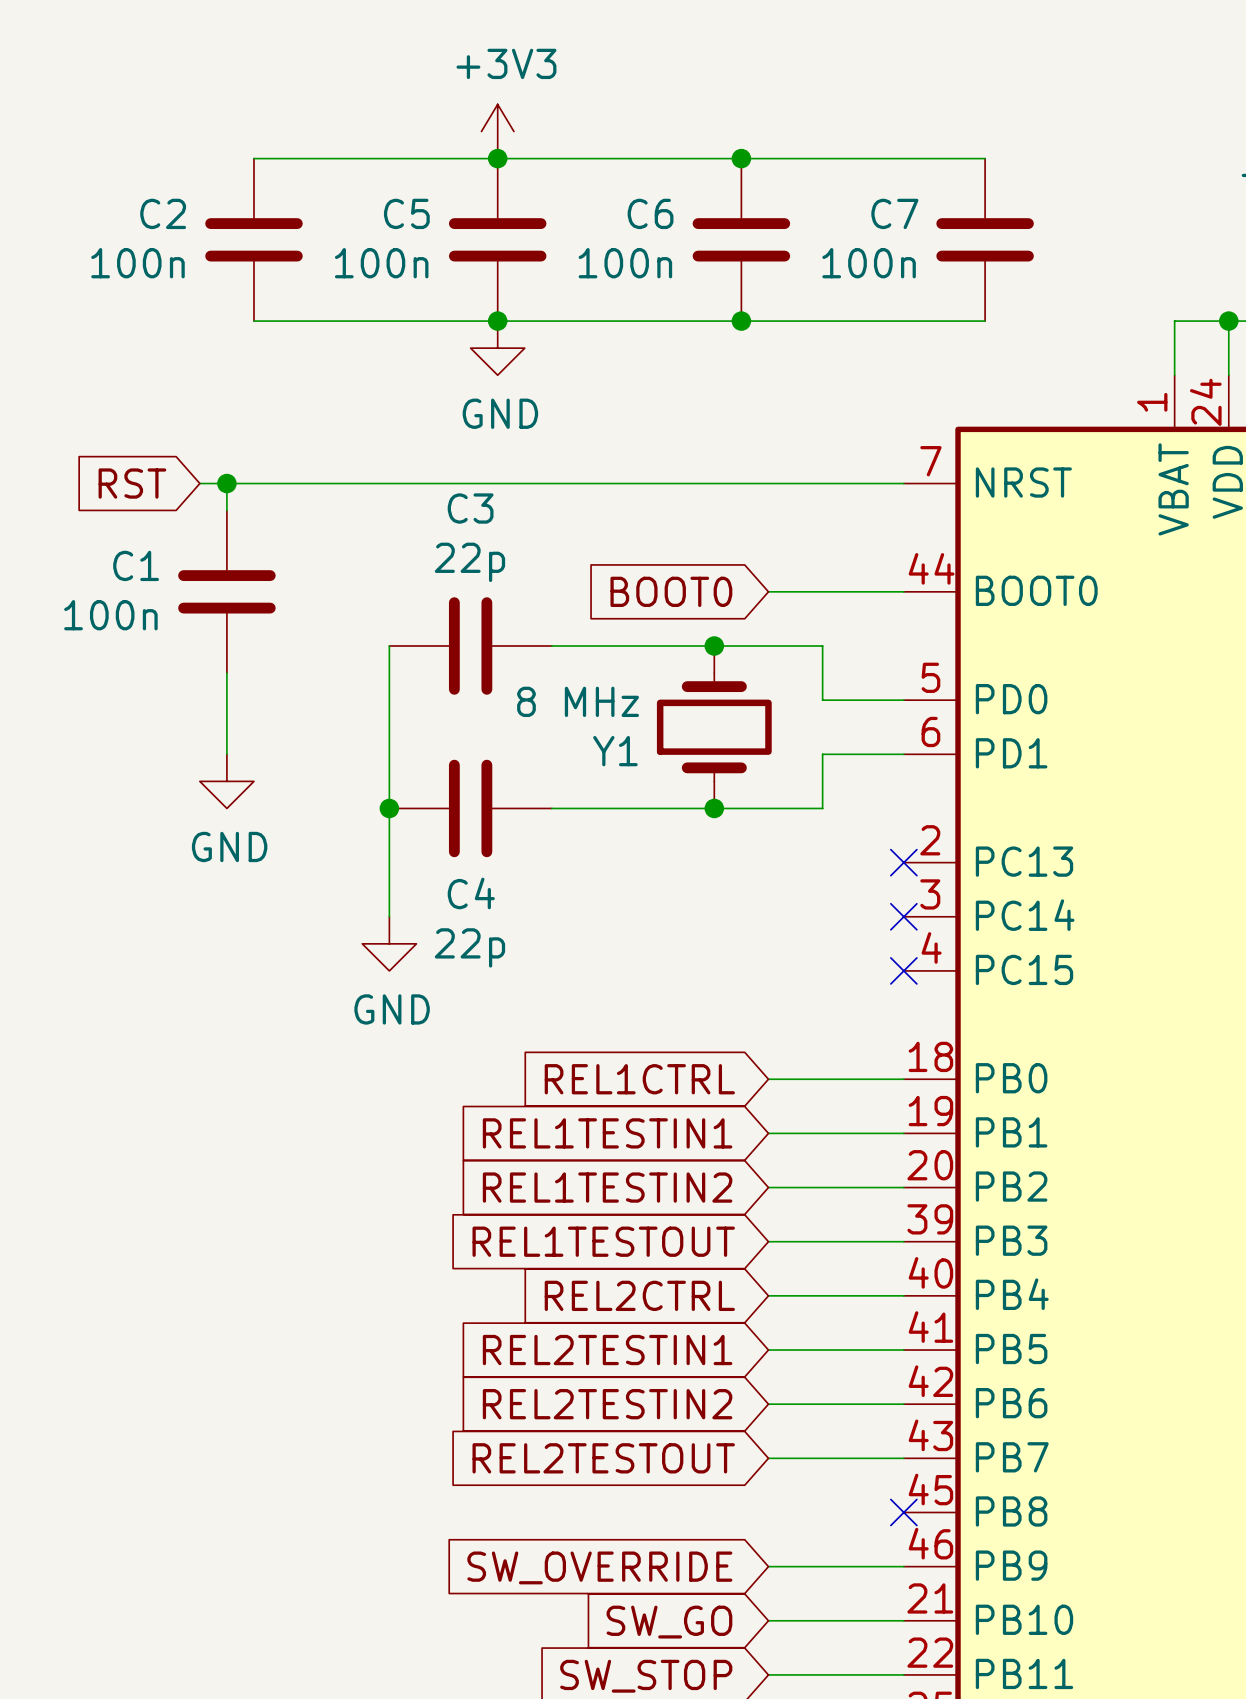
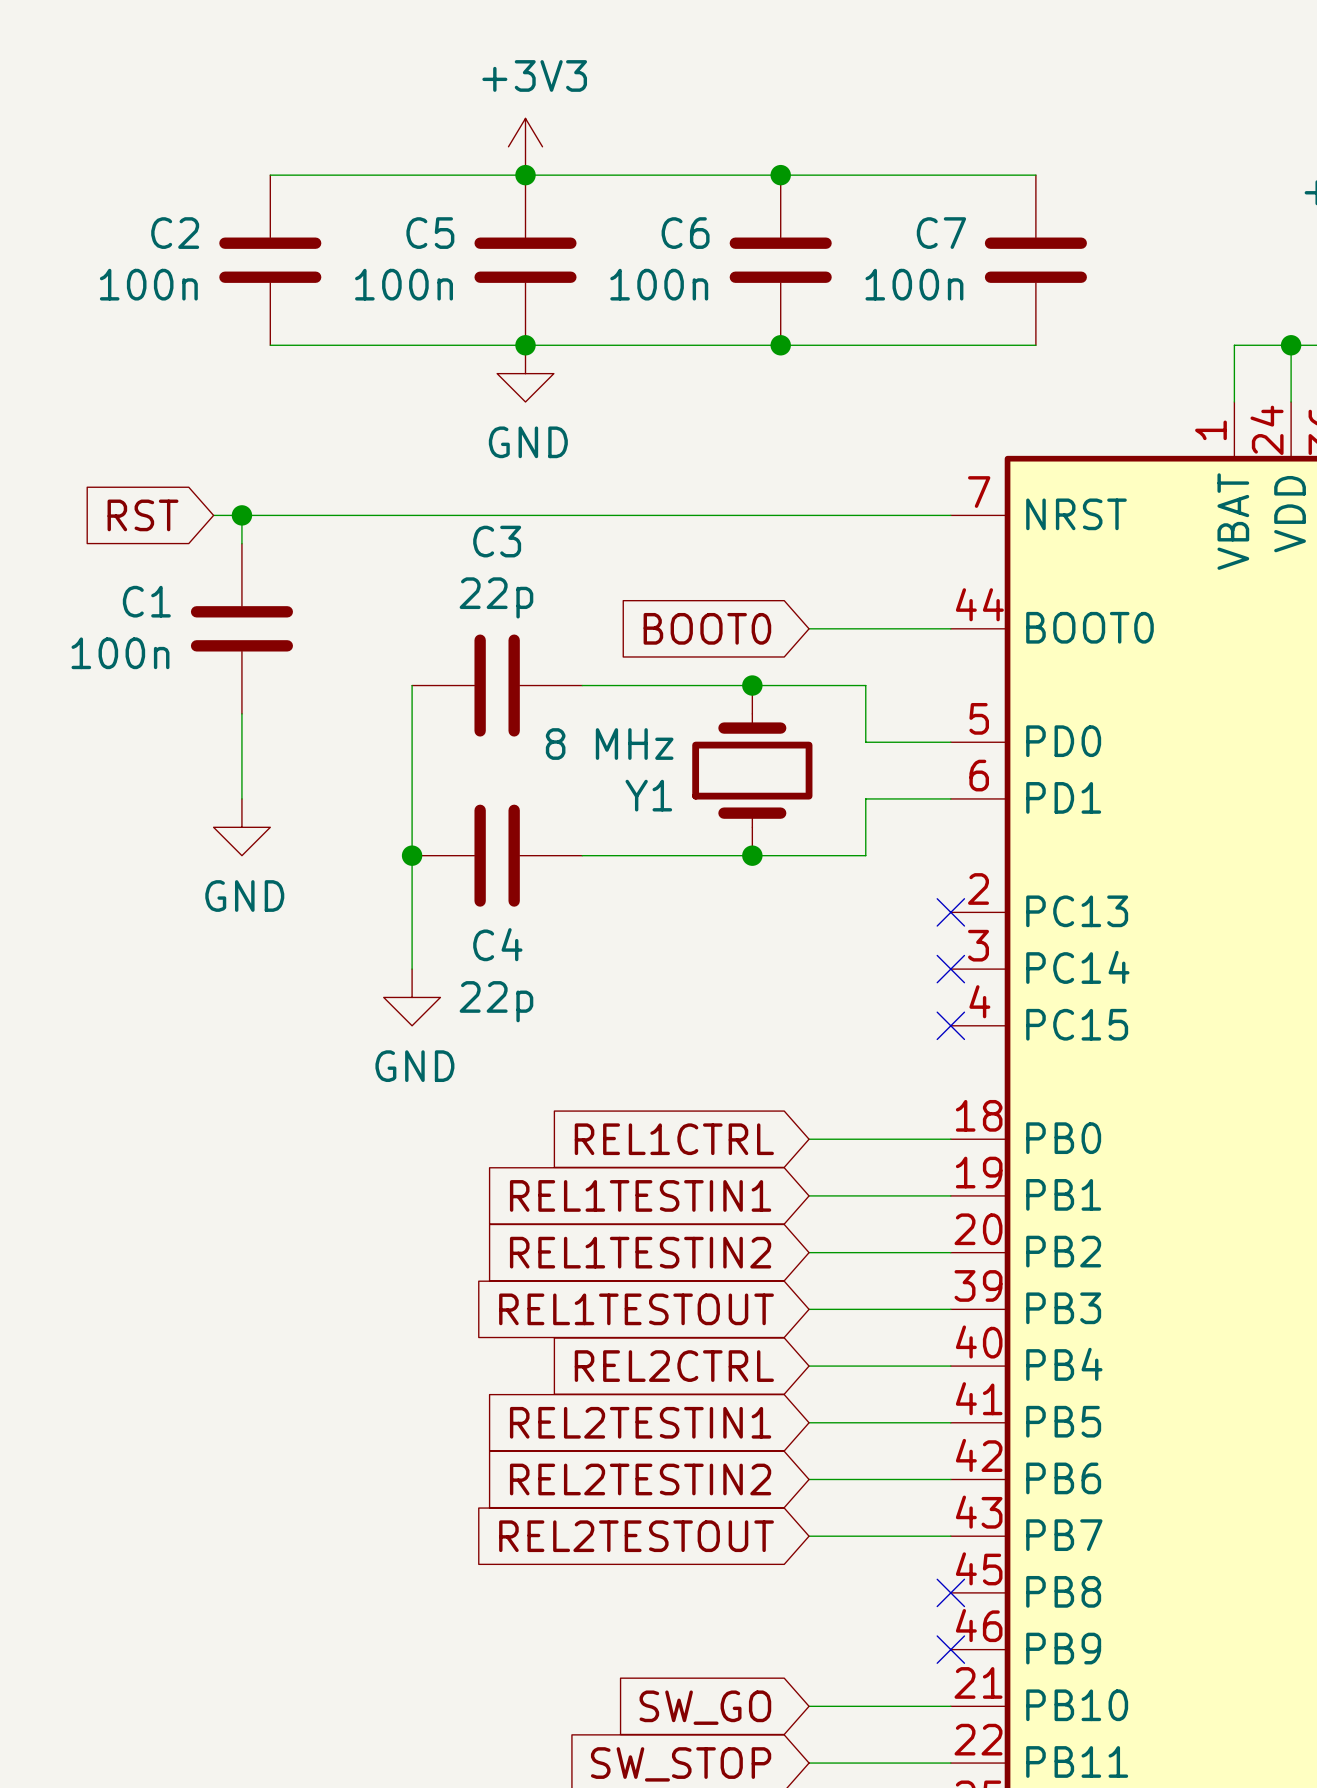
wire: (768, 1566) (903, 1566) -> none
no-connect mark: none -> (950, 1649)
global label: SW_OVERRIDE (599, 1567) -> none

